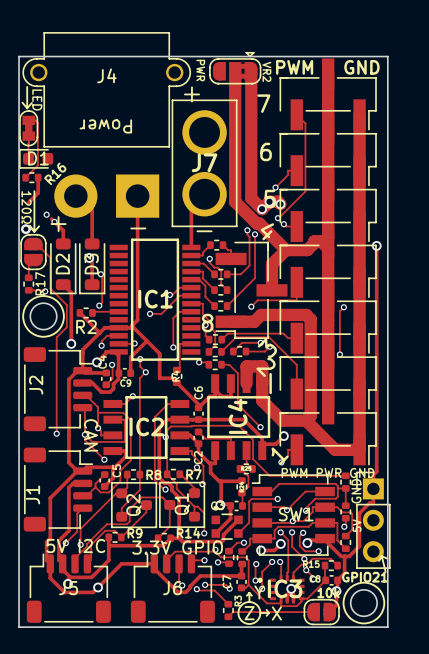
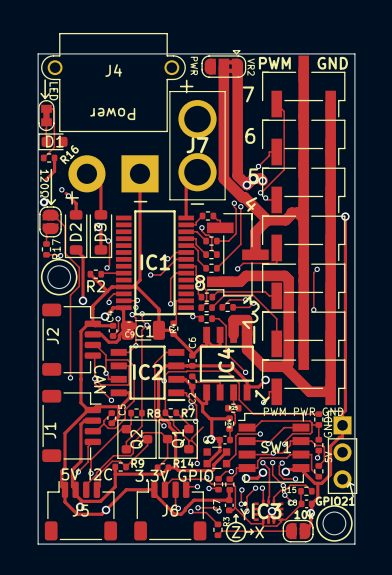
track: (146, 341) (130, 357) (130, 373) -> none
via: none -> (135, 307)
via: none -> (132, 314)
C1: none -> (143, 330)
track: (132, 396) (124, 403) -> (132, 314) (135, 318) (135, 345) (128, 352)
track: none -> (203, 427) (191, 440)

